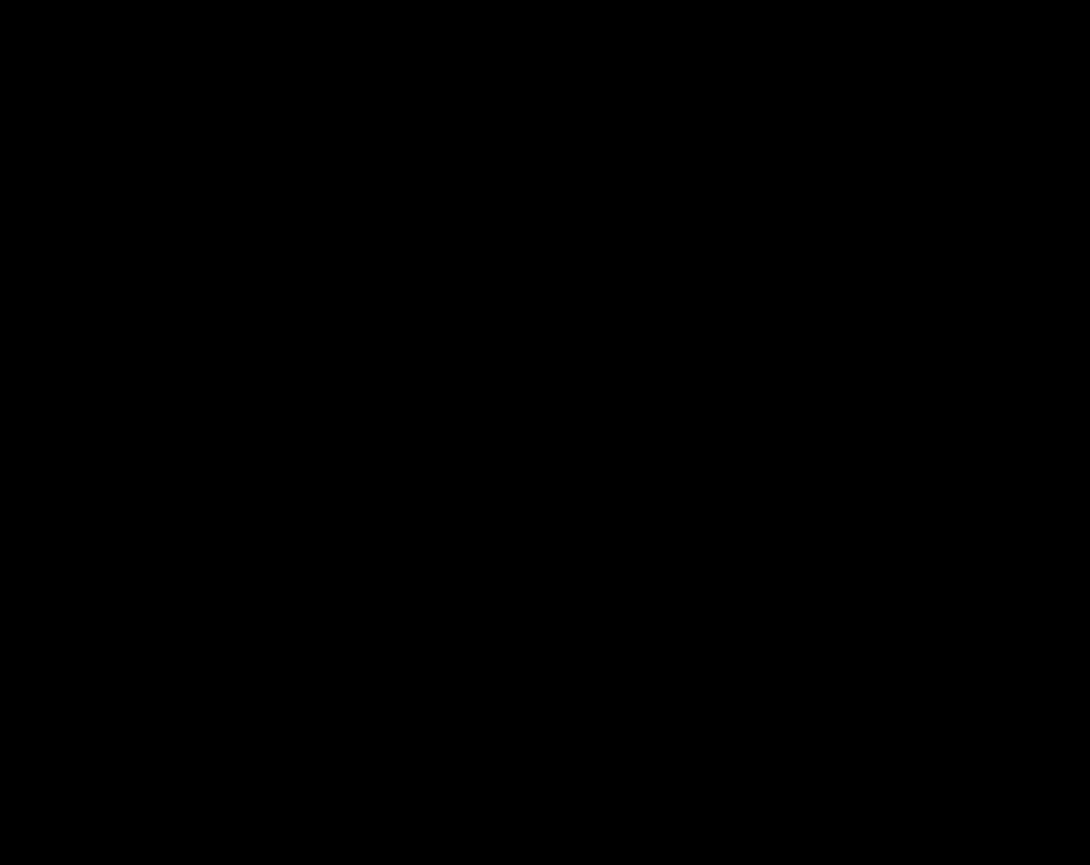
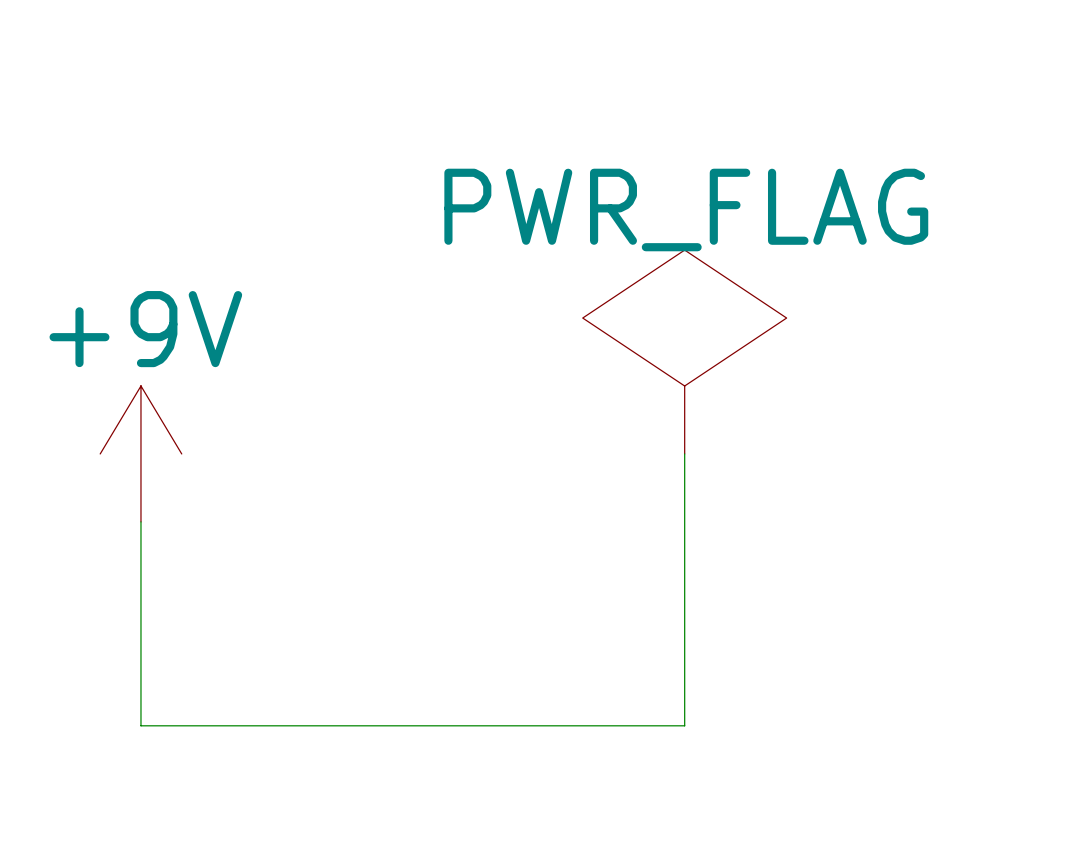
power symbol: none -> PWR_FLAG (684, 352)
power symbol: none -> +9V (140, 453)
wire: none -> (684, 453) (684, 725) (140, 725) (140, 521)

